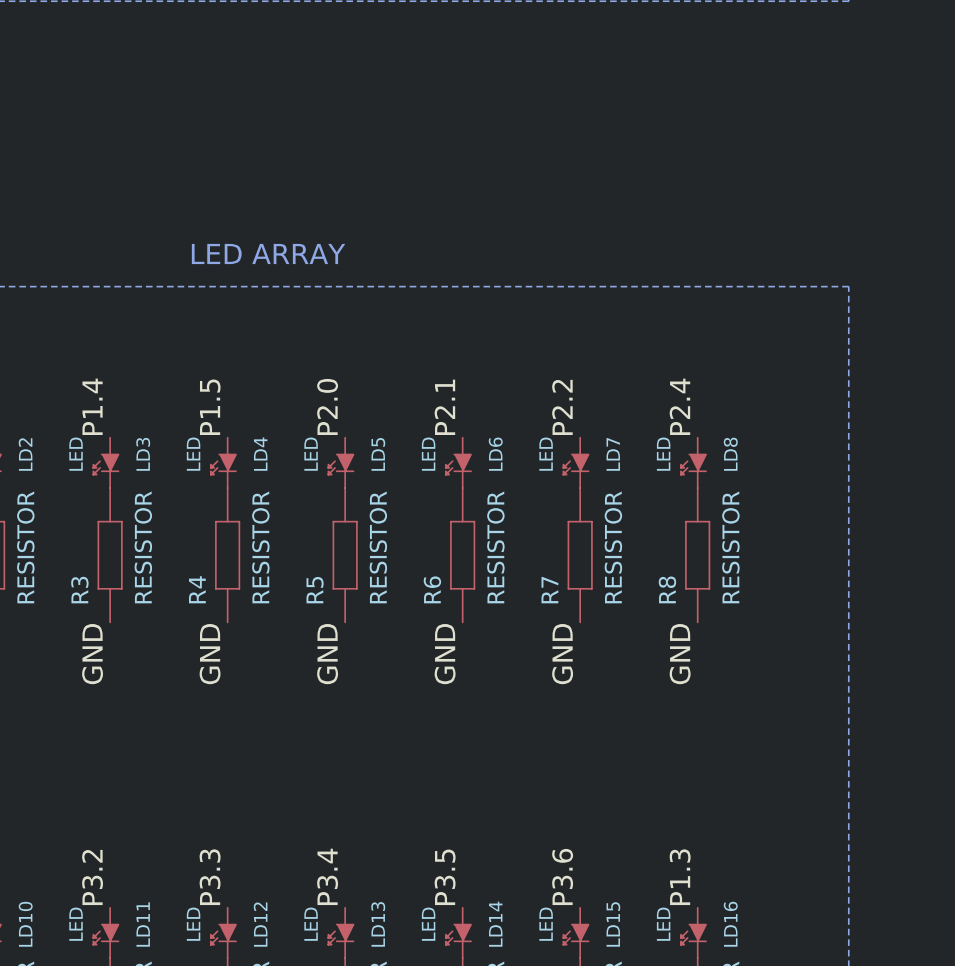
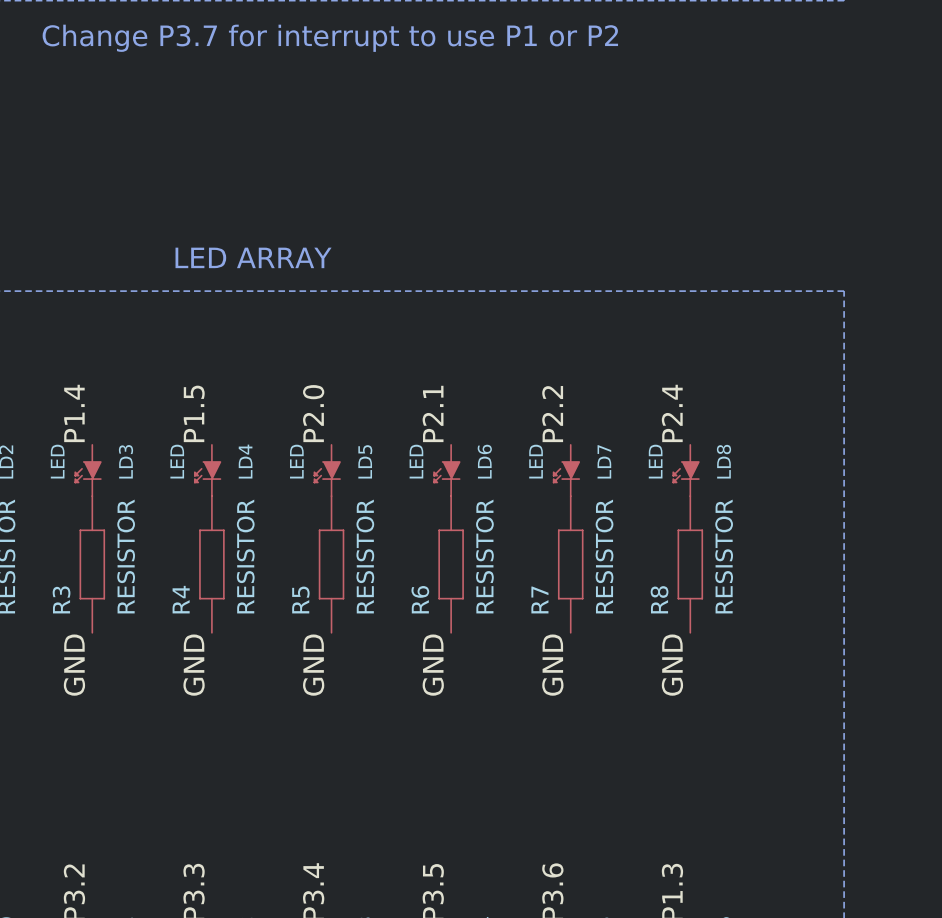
text: none -> Change P3.7 for interrupt to use P1 or P2 (330, 38)

